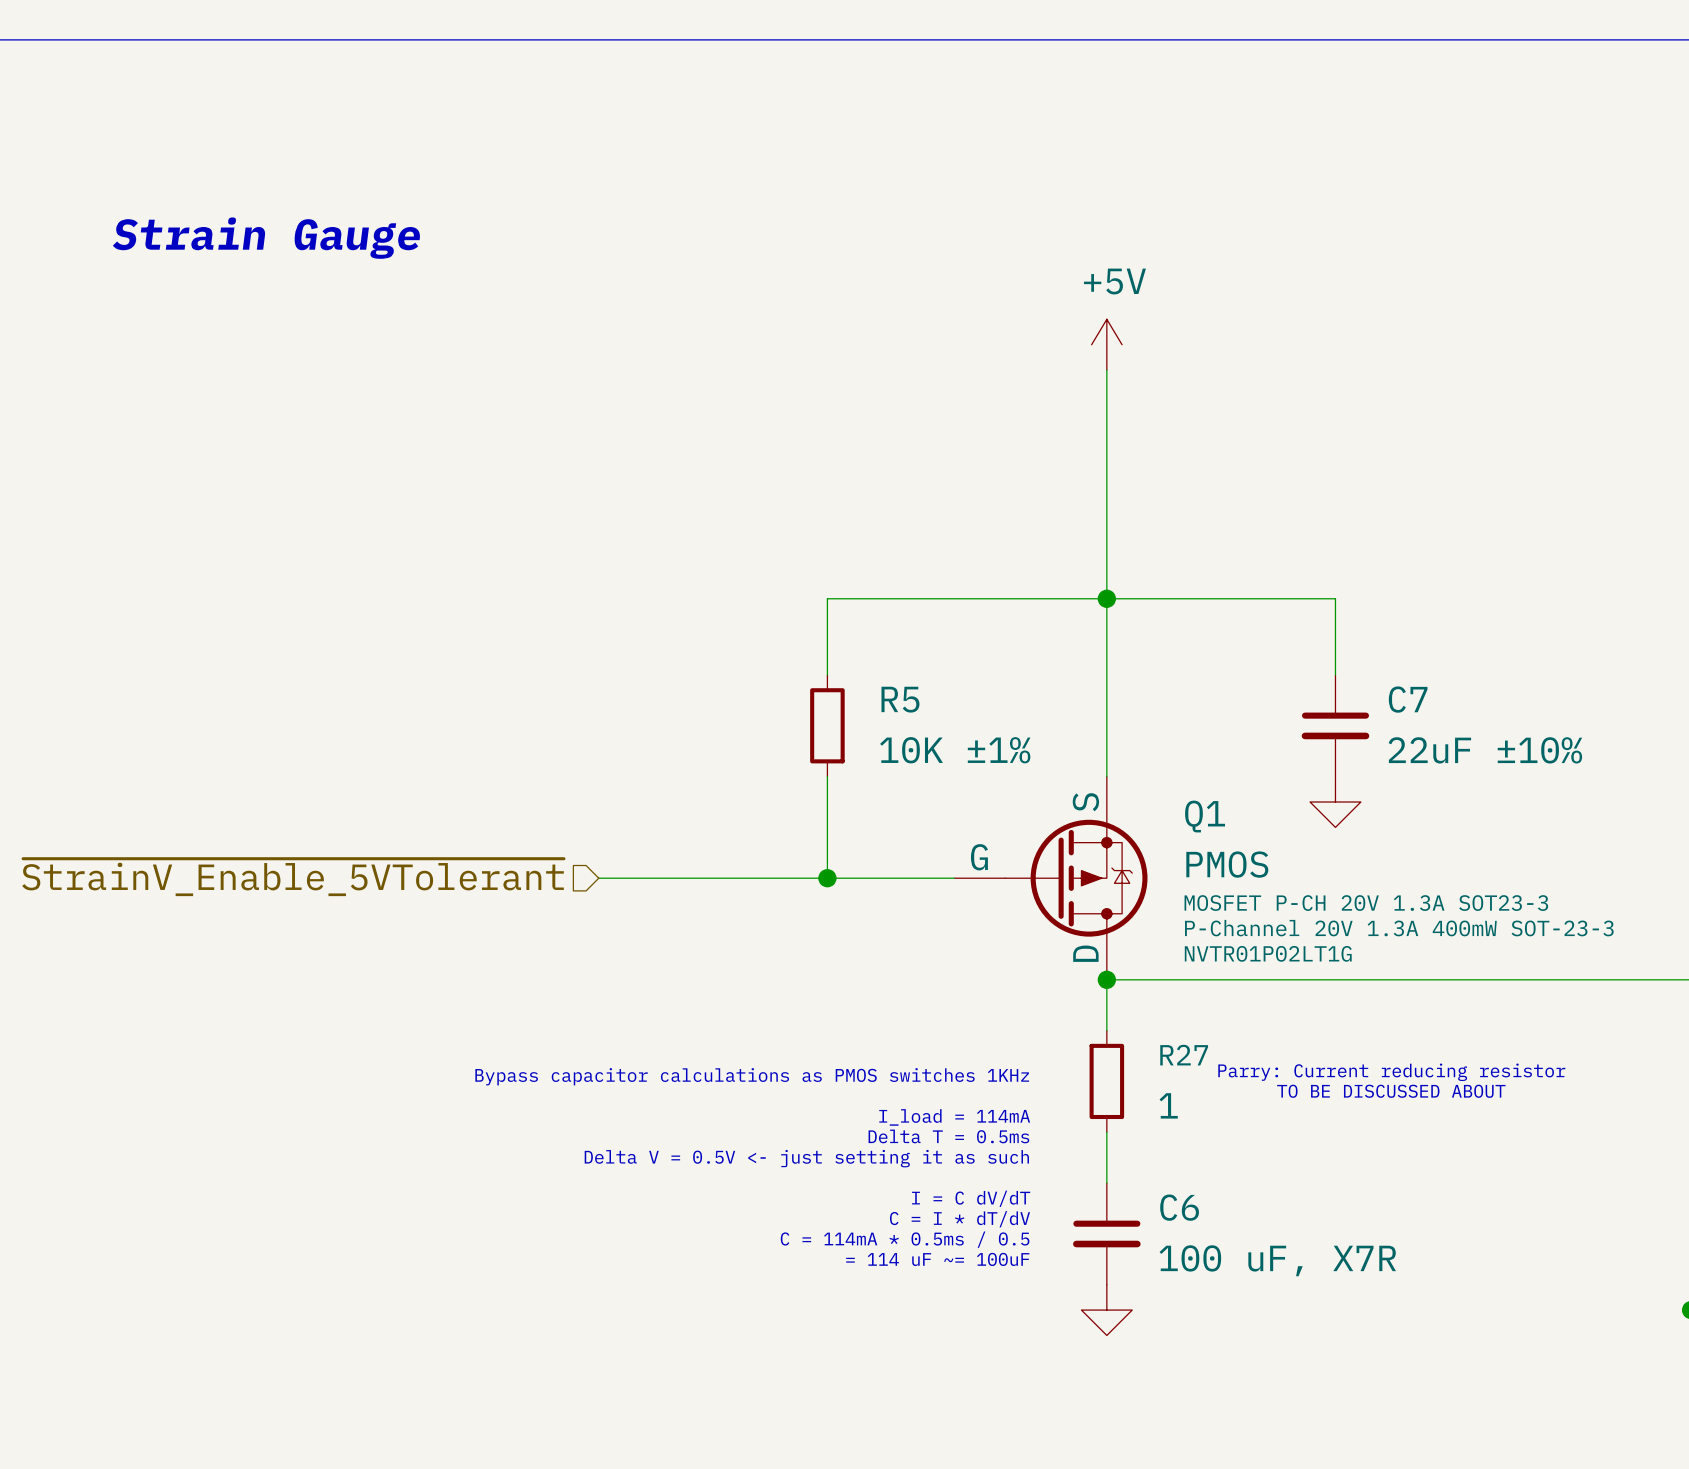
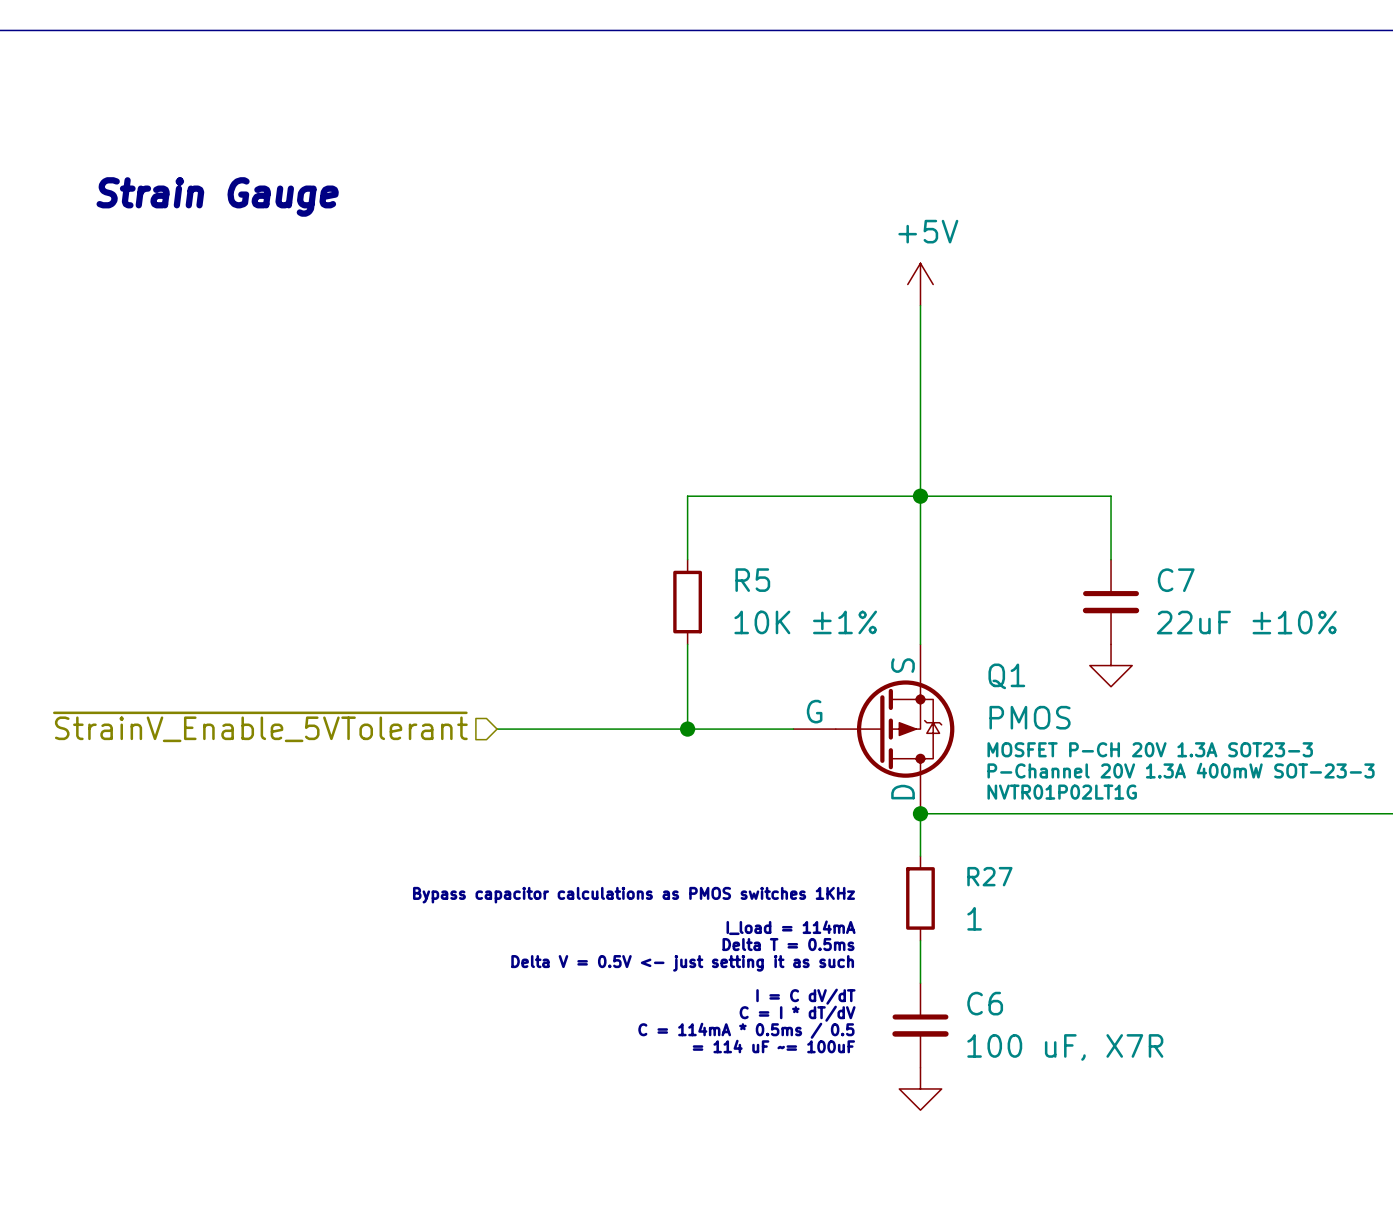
text: Parry: Current reducing resistor (1391, 1072) -> none
text: TO BE DISCUSSED ABOUT (1391, 1091) -> none

